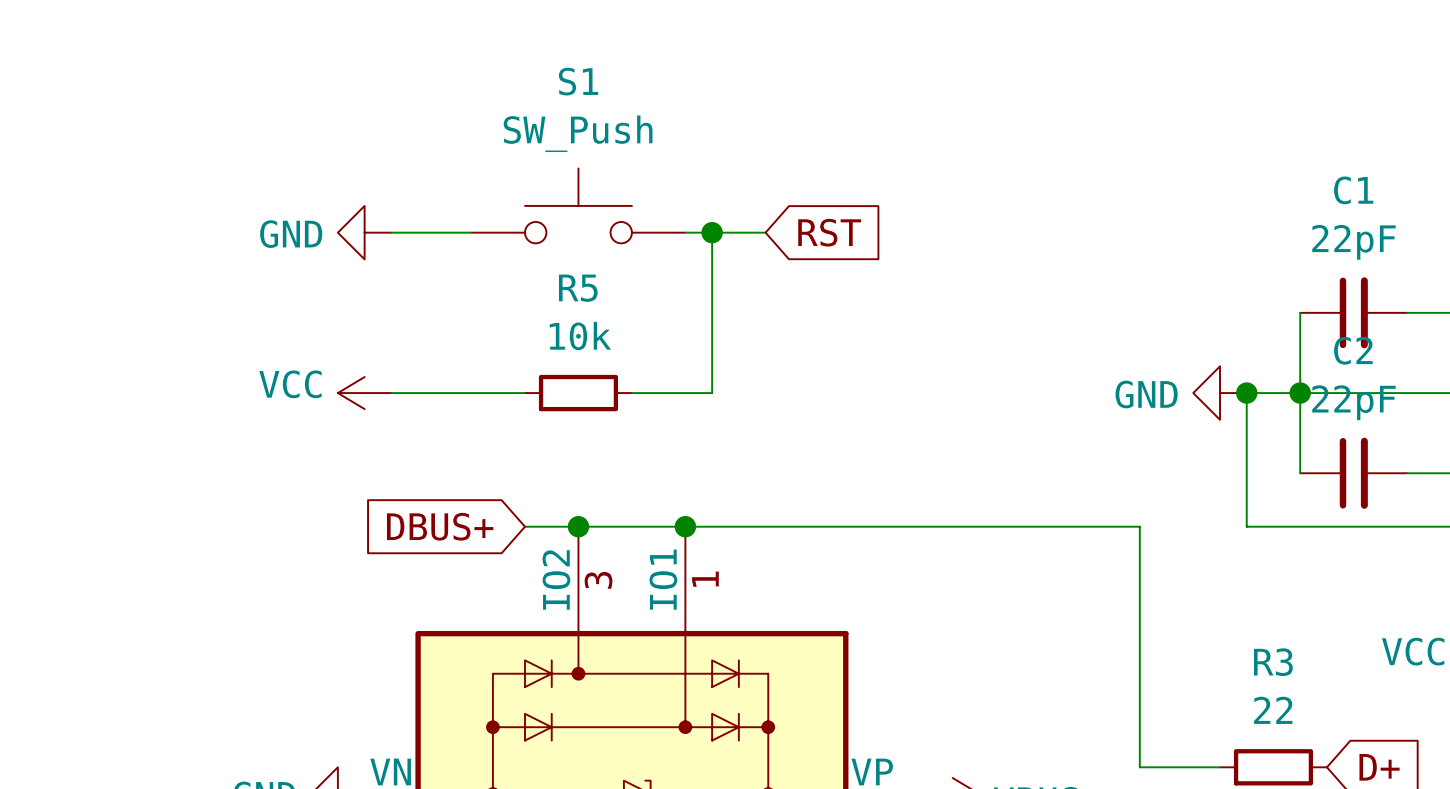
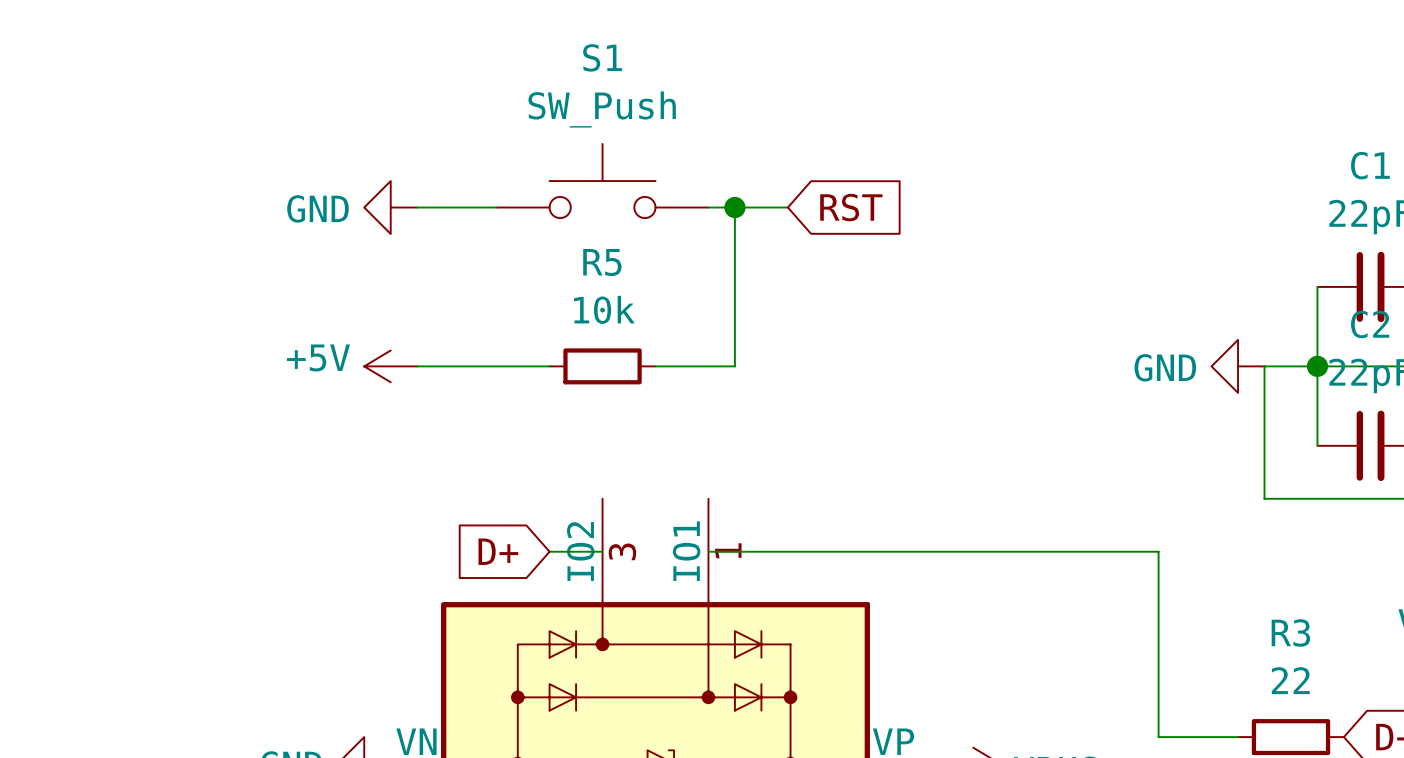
power symbol: VCC (364, 393) -> +5V (390, 366)
junction: (1246, 393) -> none
global label: DBUS+ (440, 526) -> none
wire: (525, 526) (1139, 526) (1139, 580) -> (708, 551) (1158, 551)
junction: (578, 526) -> none
junction: (685, 526) -> none
global label: none -> D+ (498, 551)
wire: none -> (549, 551) (602, 551)

